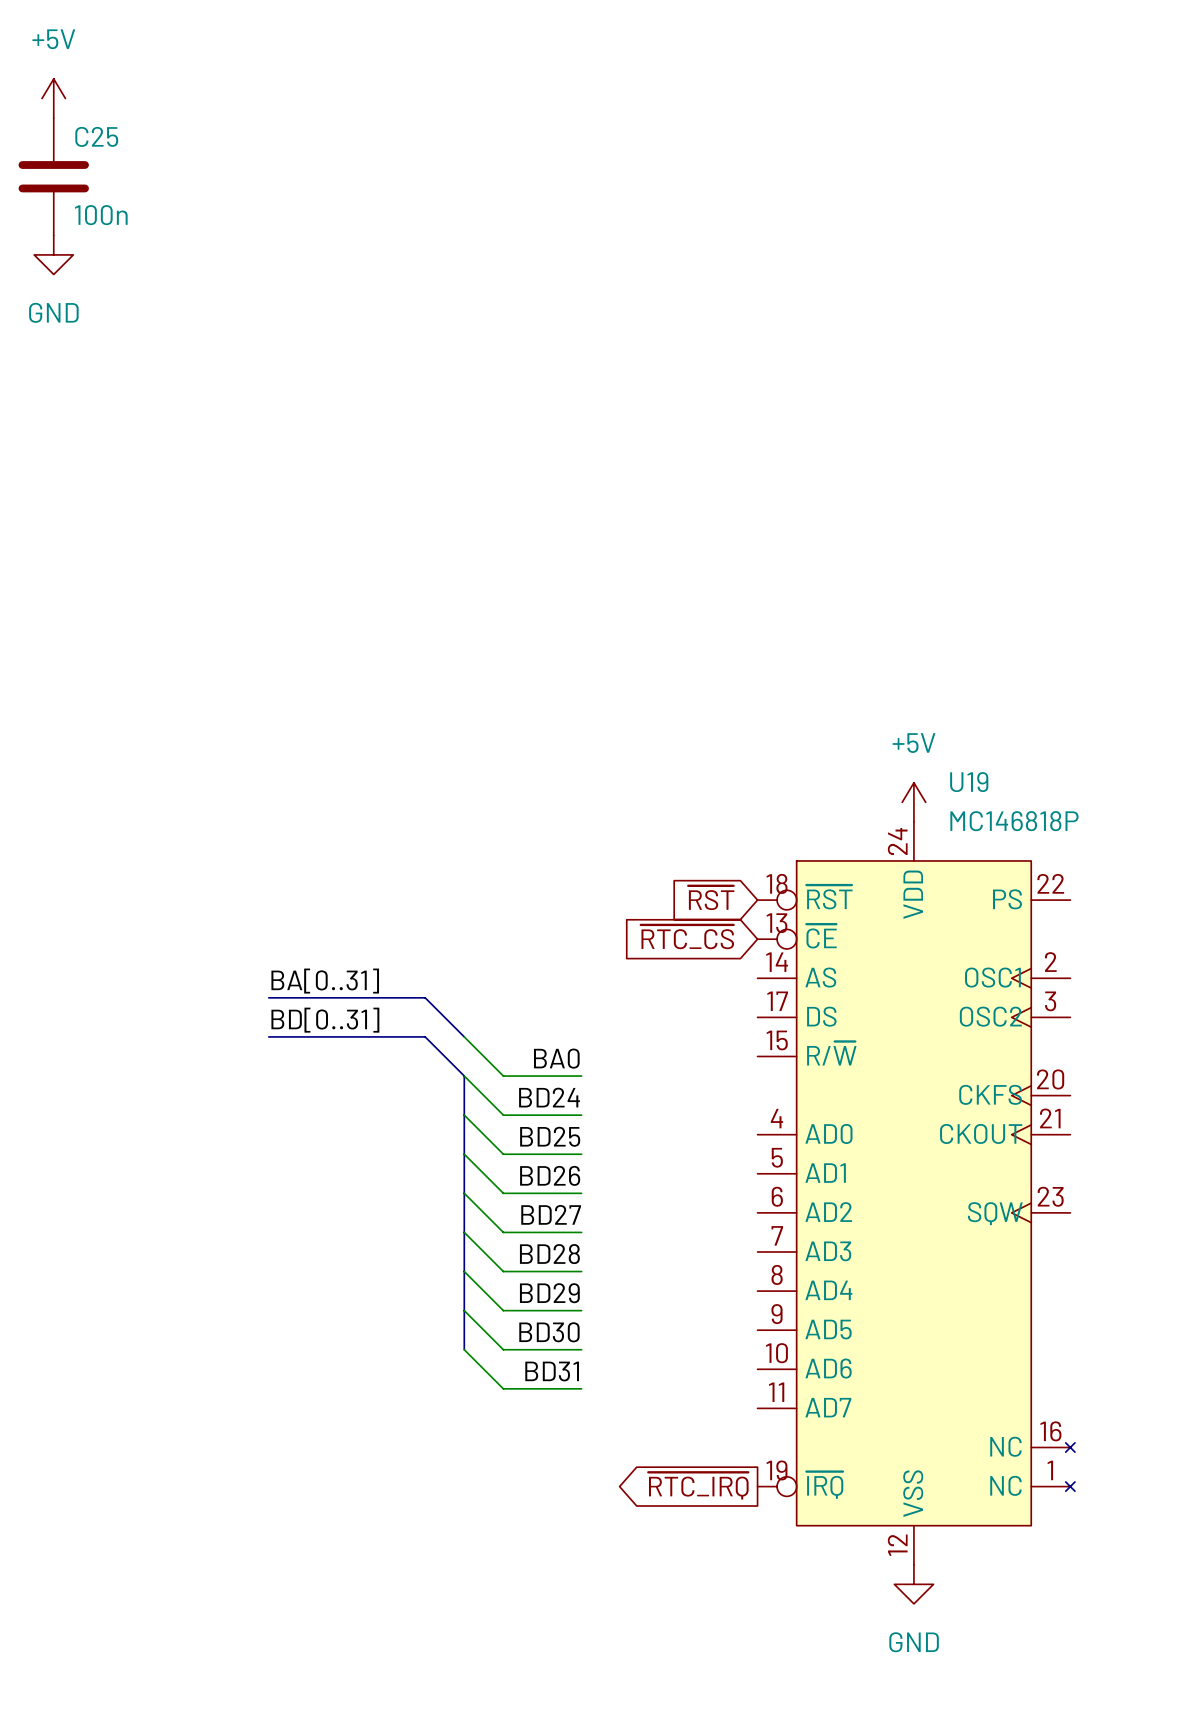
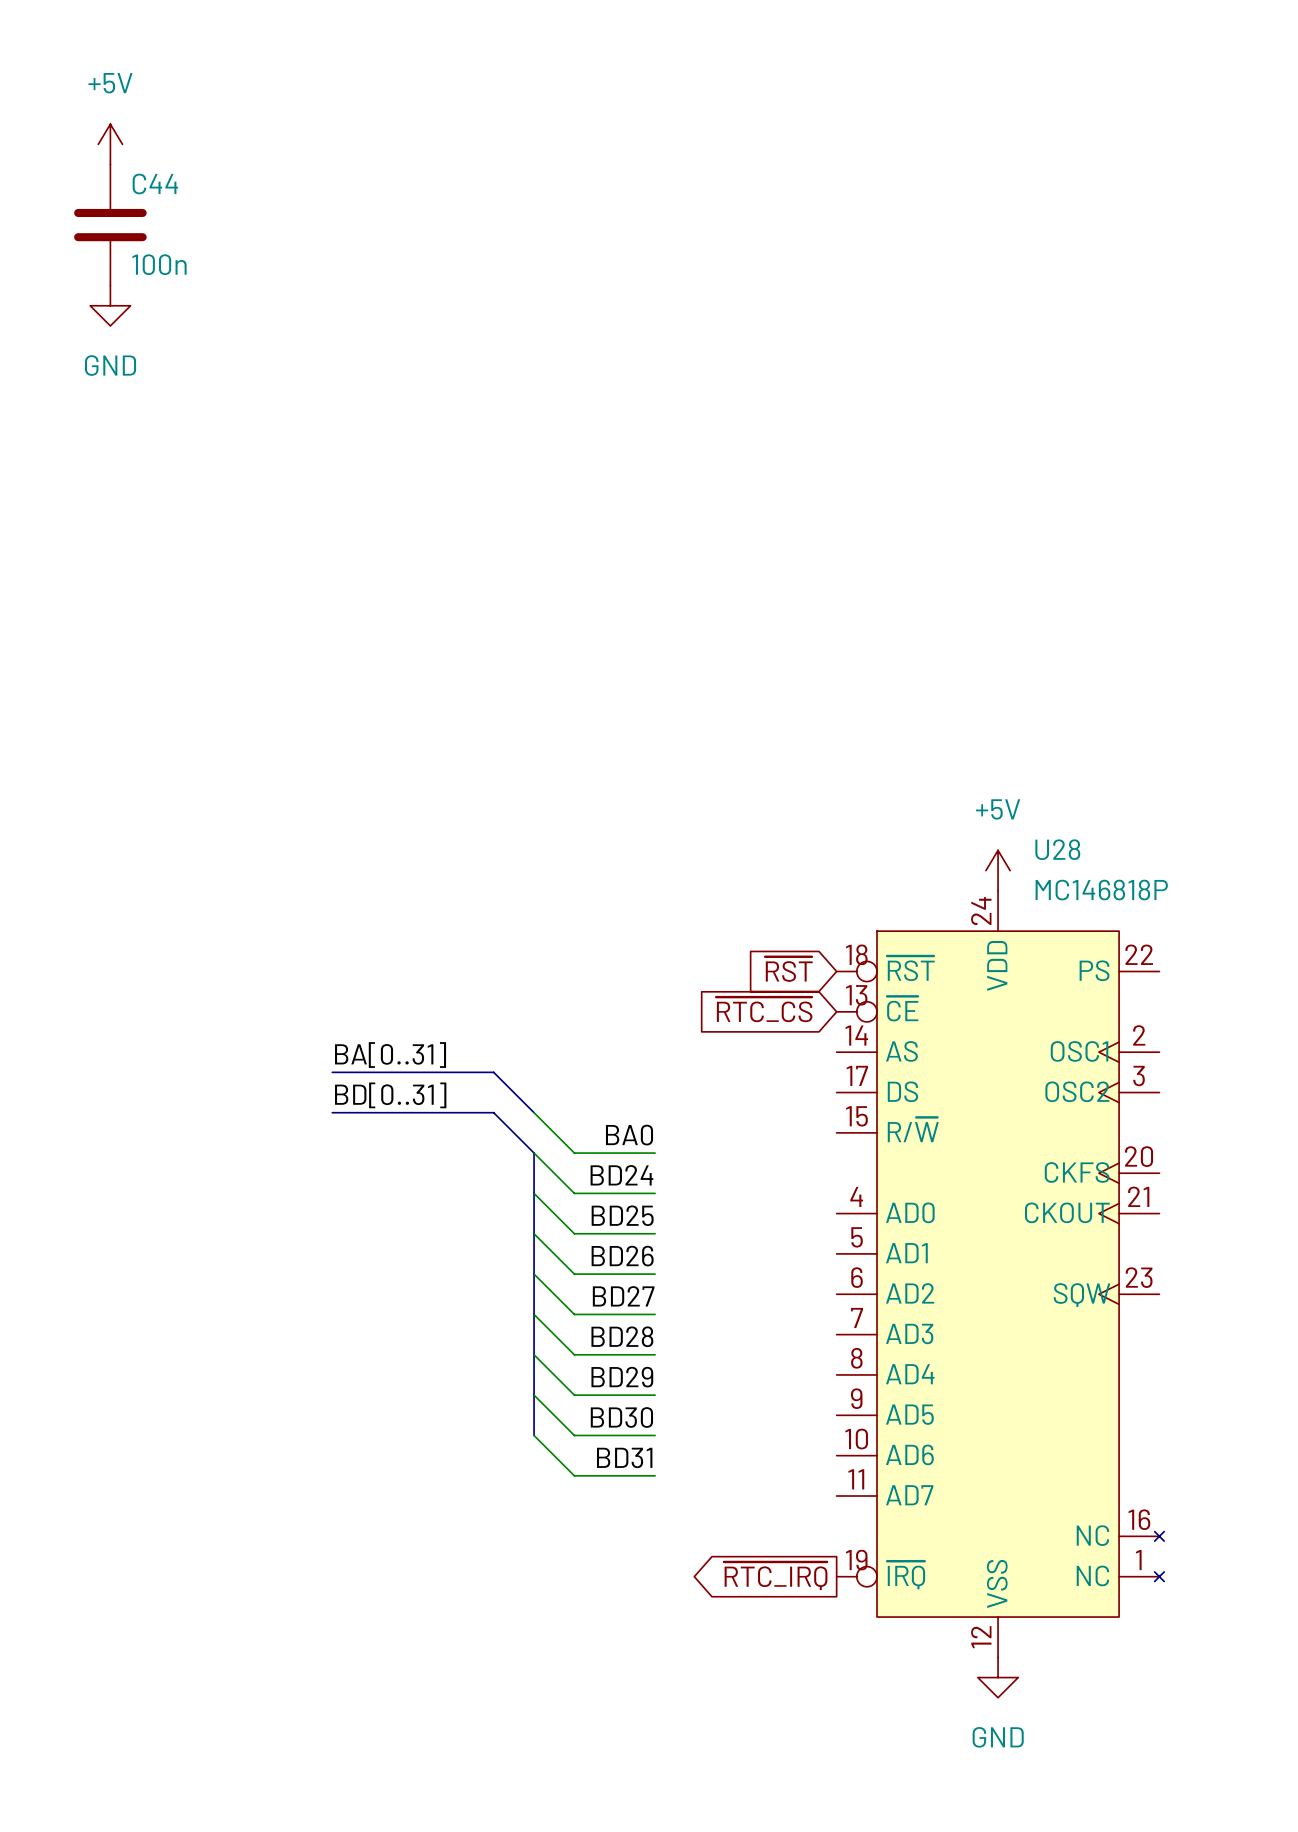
C25 name: C25 (96, 136) -> C44 (155, 183)
U19 name: U19 (969, 782) -> U28 (1057, 849)

